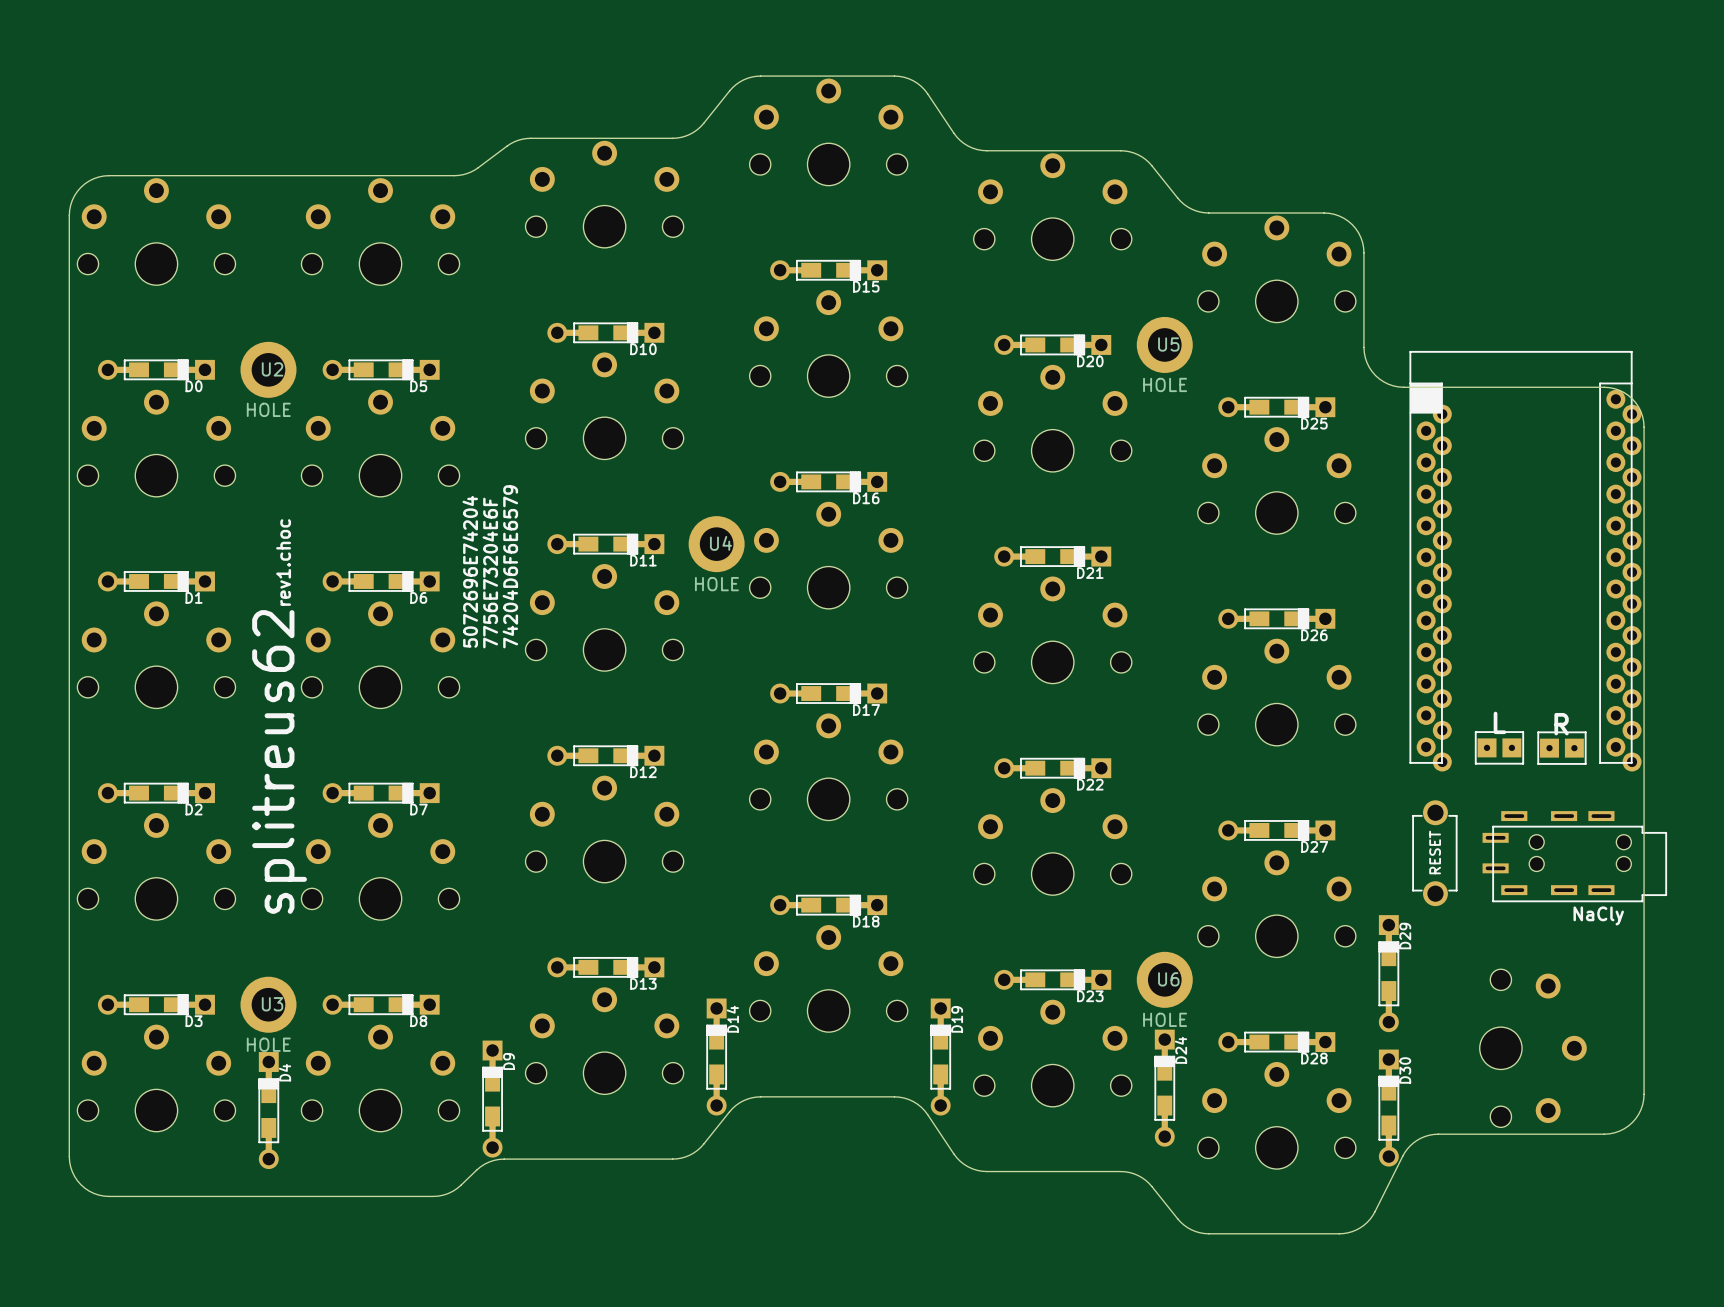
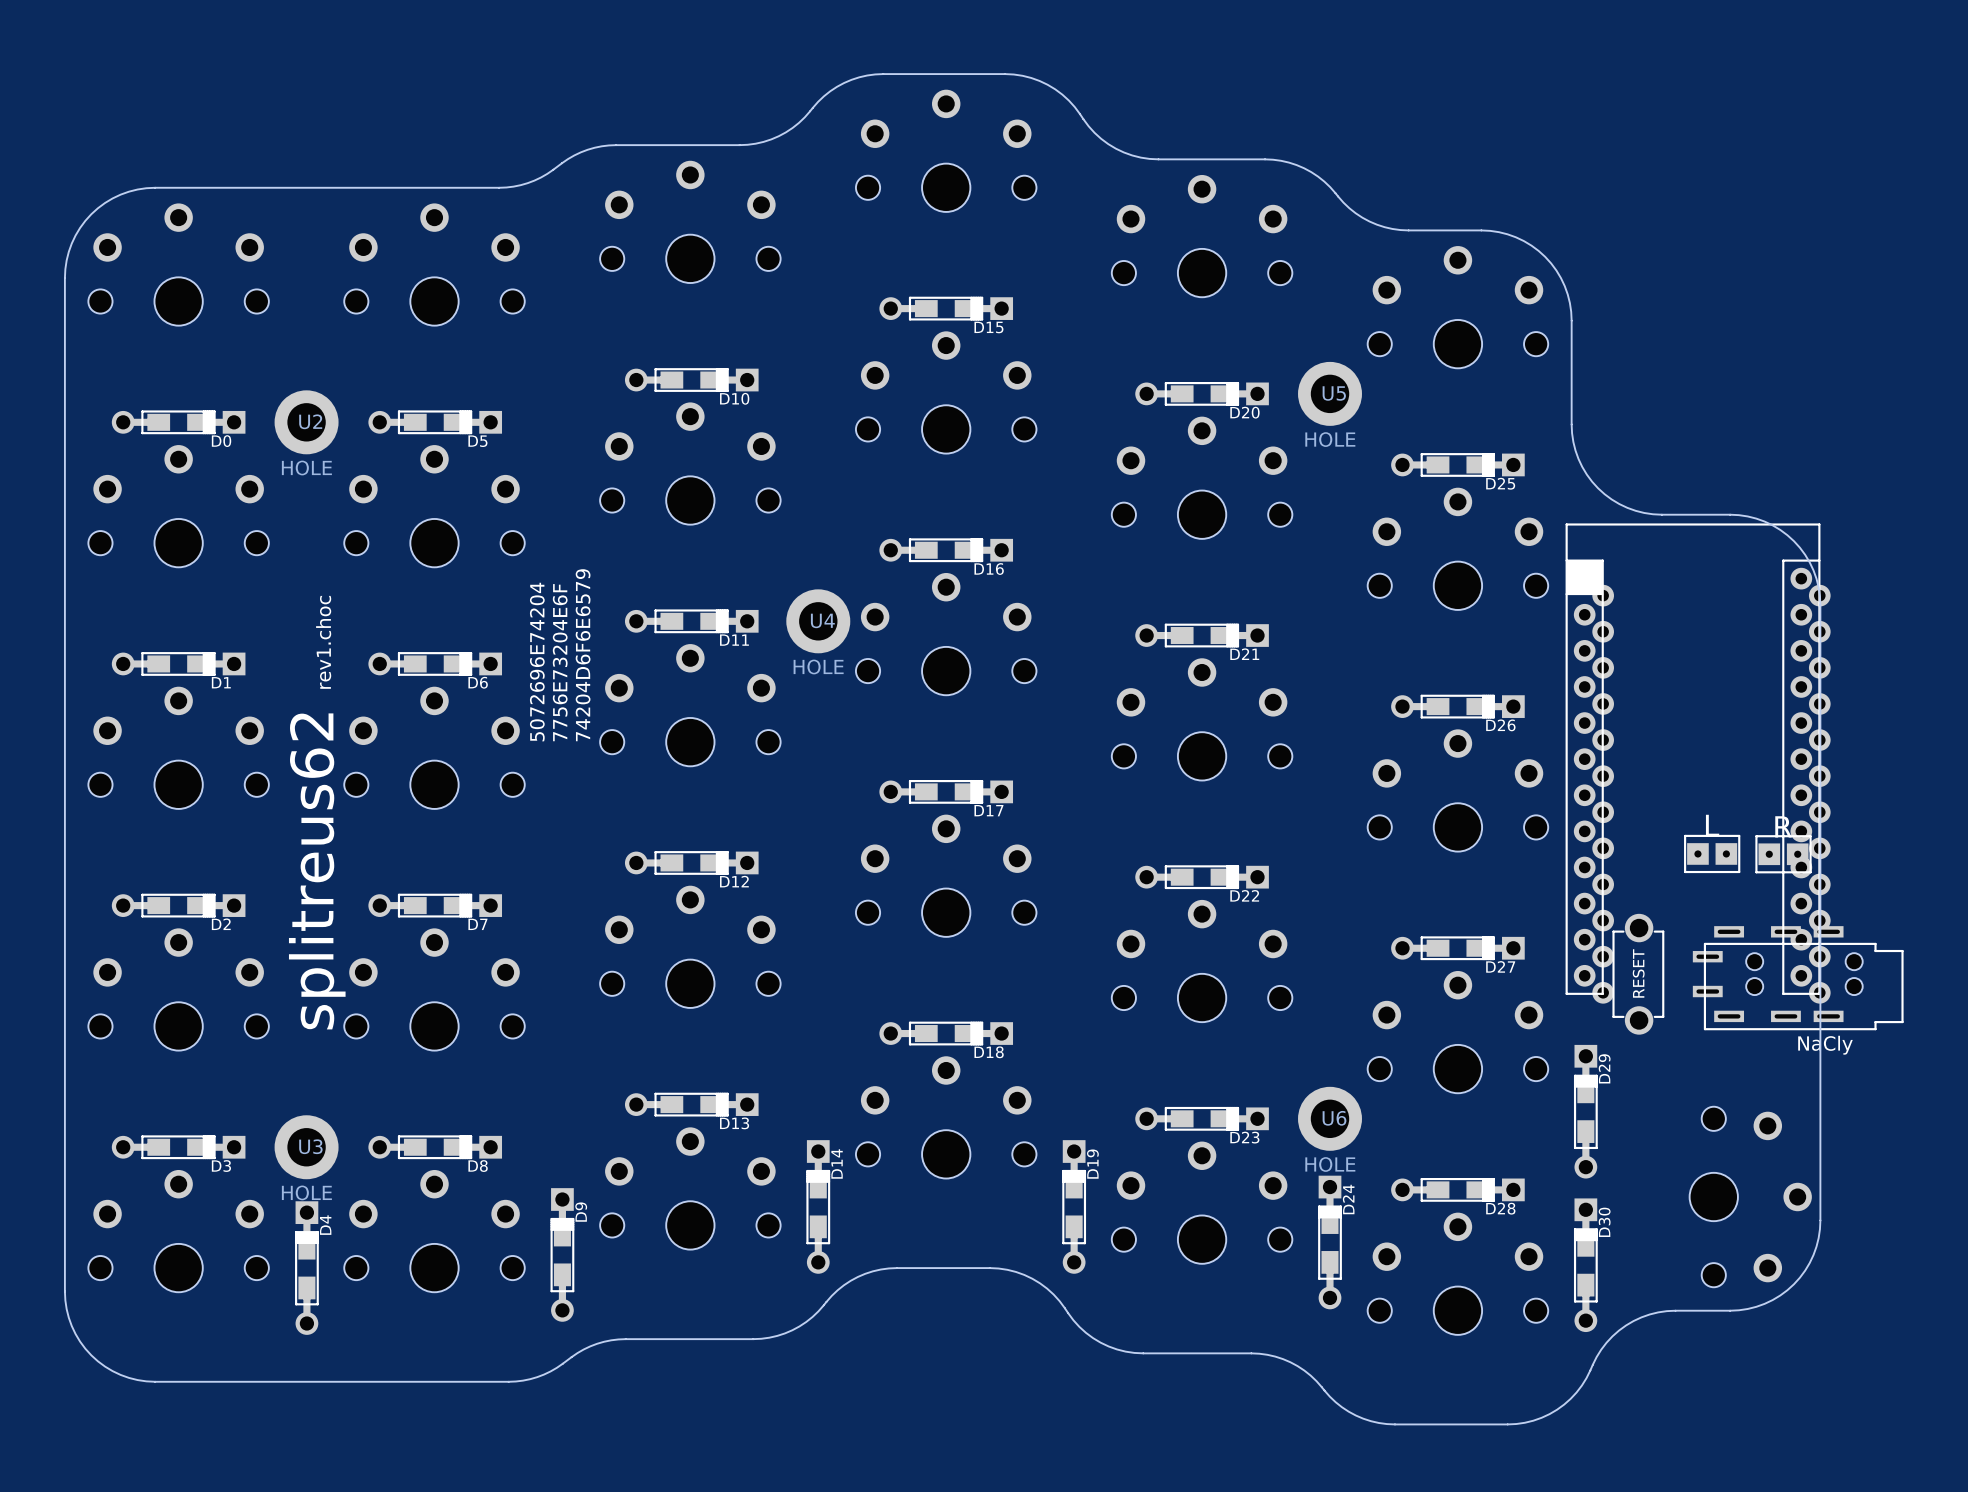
board edge: (760, 76) (904, 77) (913, 80) (924, 89) (956, 136) (972, 148) (986, 150) (1129, 151) (1148, 162) (1180, 201) (1195, 210) (1208, 213) (1324, 213) (1339, 216) (1355, 228) (1362, 242) (1364, 352) (1369, 367) (1383, 381) (1403, 387) (1609, 387) (1624, 392) (1635, 402) (1642, 416) (1644, 427) (1644, 1094) (1638, 1114) (1628, 1125) (1614, 1132) (1604, 1134) (1438, 1134) (1425, 1136) (1413, 1142) (1404, 1152) (1370, 1219) (1356, 1229) (1339, 1233) (1208, 1233) (1195, 1231) (1180, 1222) (1148, 1183) (1129, 1172) (977, 1170) (963, 1164) (956, 1157) (921, 1107) (908, 1099) (894, 1096) (751, 1097) (732, 1108) (700, 1147) (685, 1156) (672, 1159) (499, 1159) (480, 1166) (452, 1191) (438, 1196) (109, 1196) (89, 1191) (77, 1180) (70, 1166) (69, 1156) (69, 215) (74, 195) (89, 180) (103, 176) (458, 175) (474, 170) (510, 143) (522, 139) (681, 137) (700, 126) (735, 84) (747, 78) (760, 76) -> (883, 74) (859, 77) (837, 86) (823, 96) (792, 127) (778, 136) (755, 143) (601, 146) (574, 155) (534, 180) (506, 187) (146, 188) (128, 191) (112, 198) (97, 208) (80, 227) (68, 251) (64, 278) (64, 1291) (68, 1317) (80, 1341) (91, 1355) (112, 1371) (128, 1377) (146, 1381) (515, 1381) (543, 1374) (583, 1349) (611, 1340) (753, 1339) (777, 1335) (806, 1321) (843, 1285) (872, 1271) (896, 1268) (998, 1268) (1016, 1271) (1039, 1283) (1053, 1294) (1085, 1332) (1100, 1342) (1117, 1349) (1143, 1353) (1267, 1354) (1297, 1366) (1310, 1375) (1342, 1407) (1371, 1421) (1394, 1424) (1507, 1424) (1533, 1420) (1549, 1414) (1564, 1404) (1581, 1385) (1606, 1342) (1619, 1330) (1633, 1321) (1649, 1314) (1666, 1311) (1747, 1308) (1764, 1303) (1780, 1295) (1799, 1277) (1809, 1263) (1818, 1238) (1820, 1220) (1820, 604) (1816, 578) (1805, 554) (1787, 535) (1772, 525) (1756, 518) (1738, 515) (1644, 512) (1627, 507) (1611, 499) (1592, 481) (1578, 458) (1572, 433) (1571, 320) (1567, 294) (1560, 278) (1551, 263) (1538, 250) (1523, 241) (1507, 234) (1490, 230) (1400, 230) (1376, 224) (1349, 208) (1318, 176) (1304, 168) (1281, 160) (1158, 159) (1132, 155) (1115, 148) (1101, 138) (1062, 94) (1047, 84) (1031, 77) (1005, 74) (883, 74)
part position: (1525, 561) -> (1698, 763)

